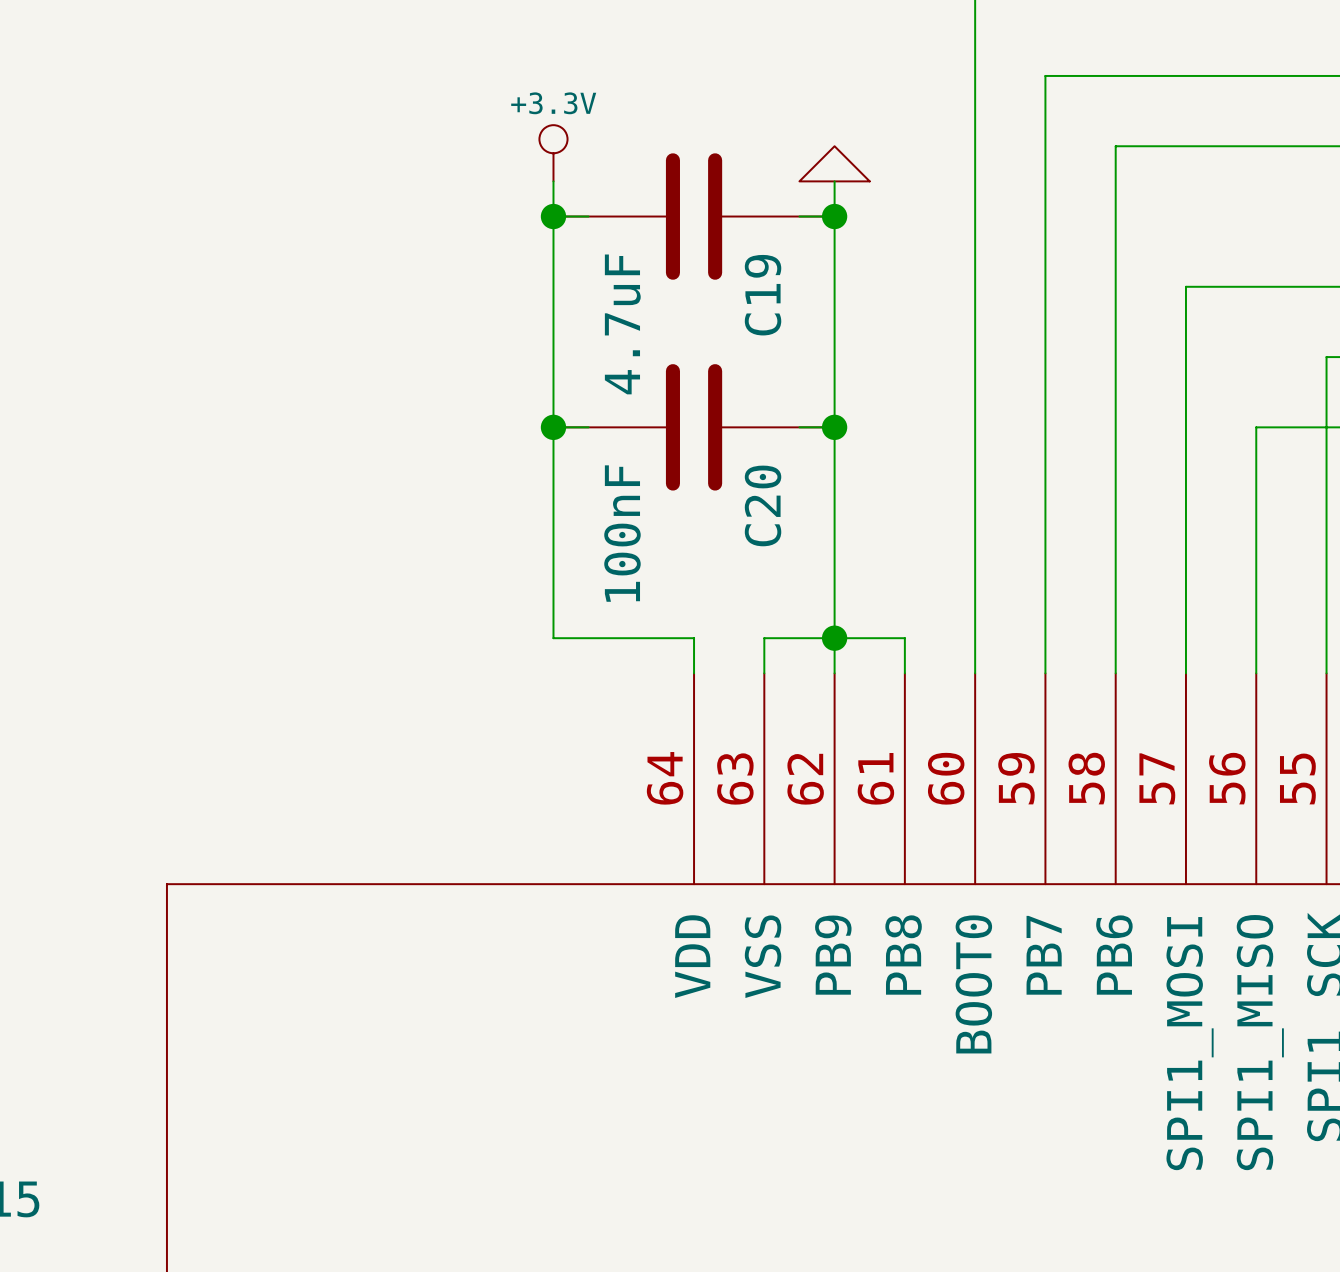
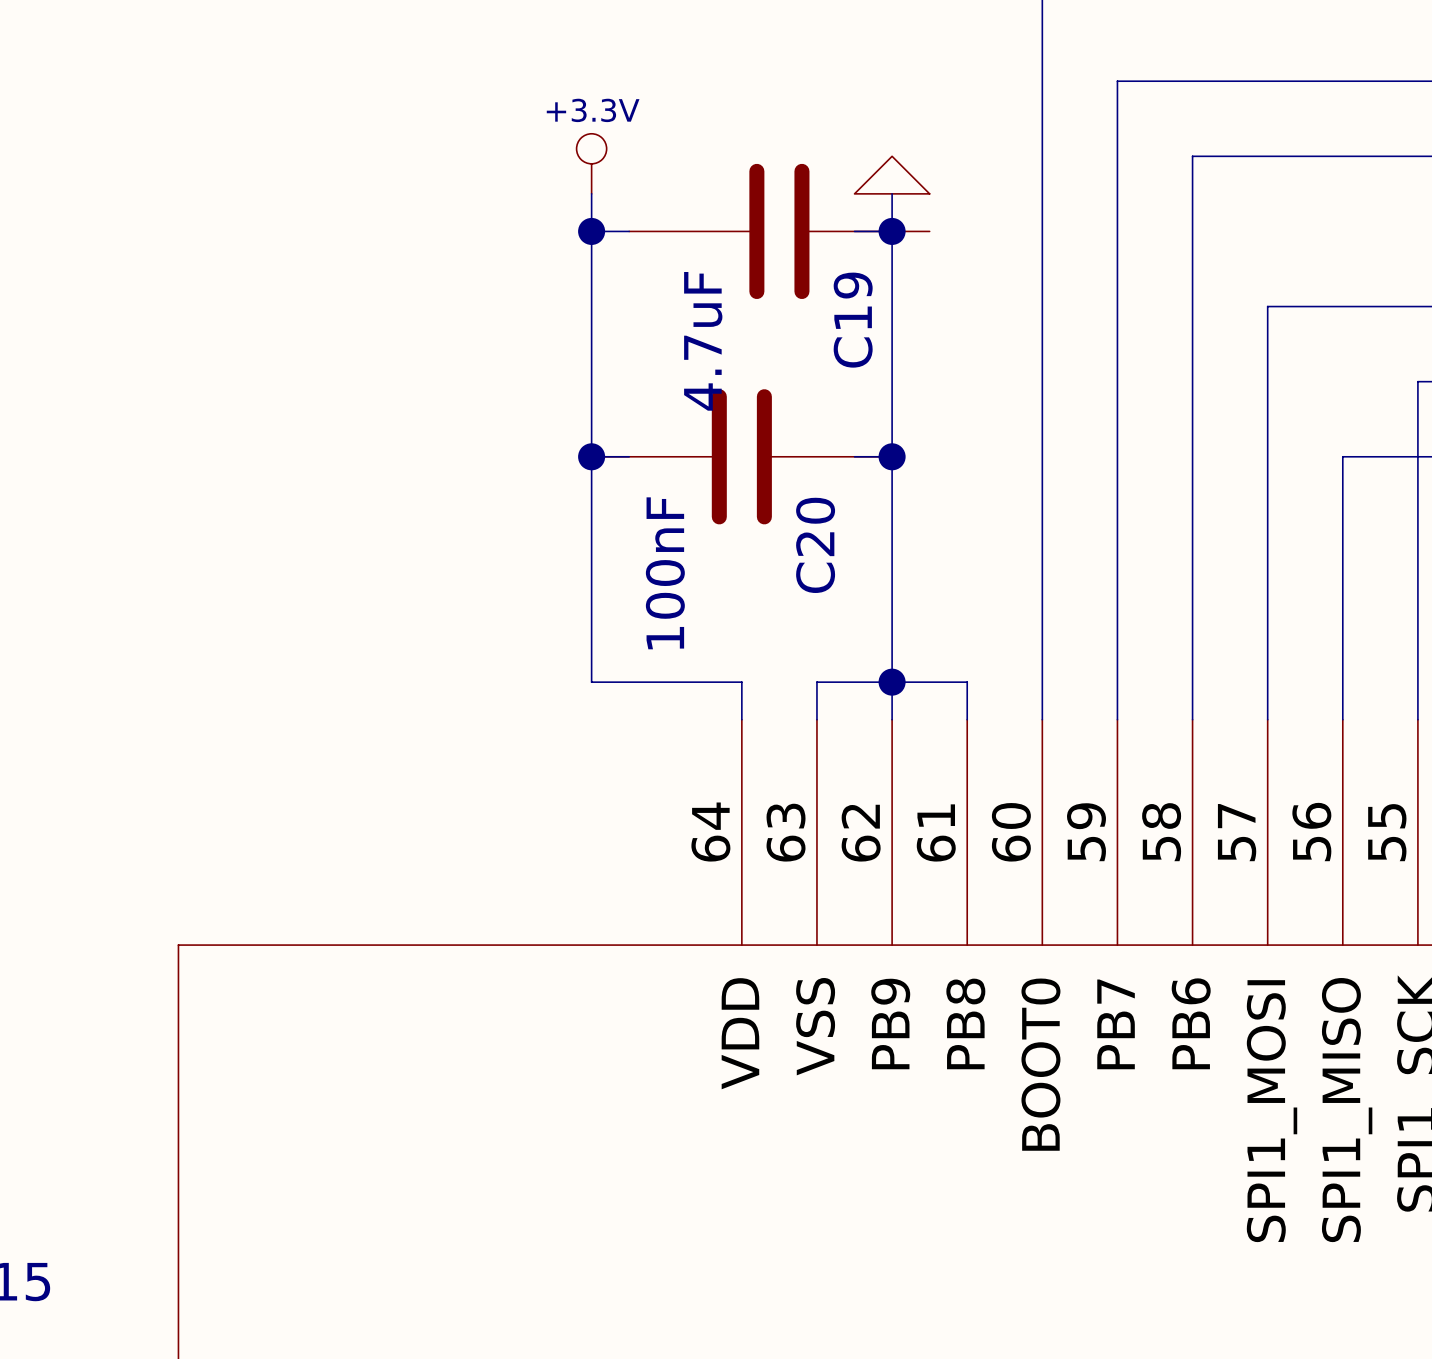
C19 position: (694, 216) -> (779, 231)

